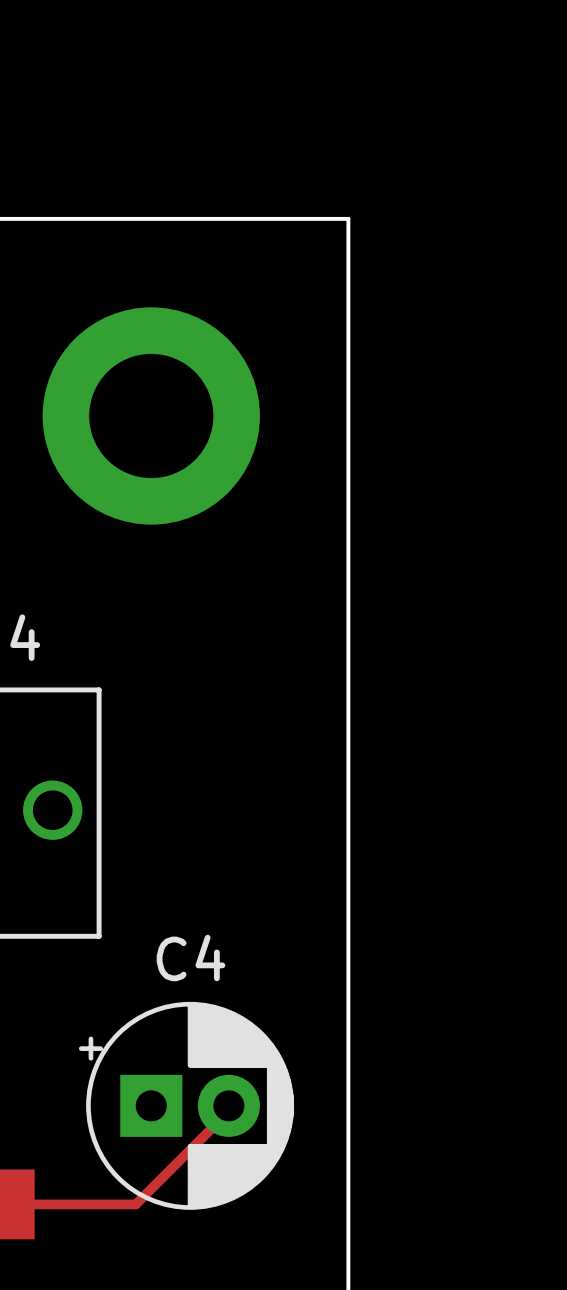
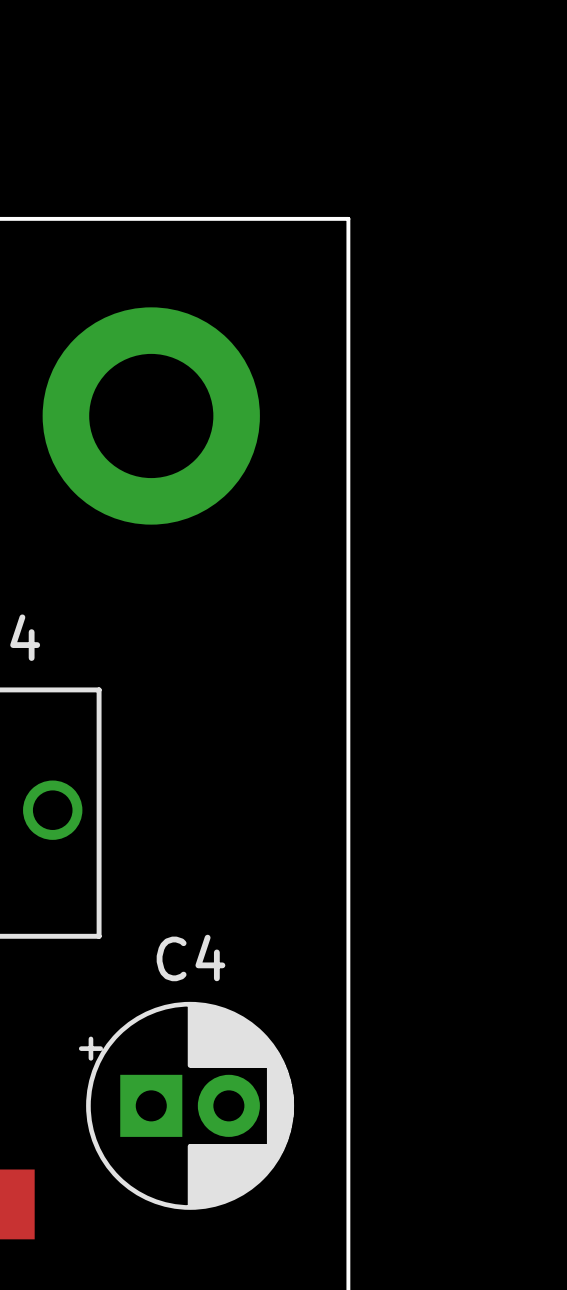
track: (228, 1105) (228, 1111) (135, 1204) (14, 1204) -> none

